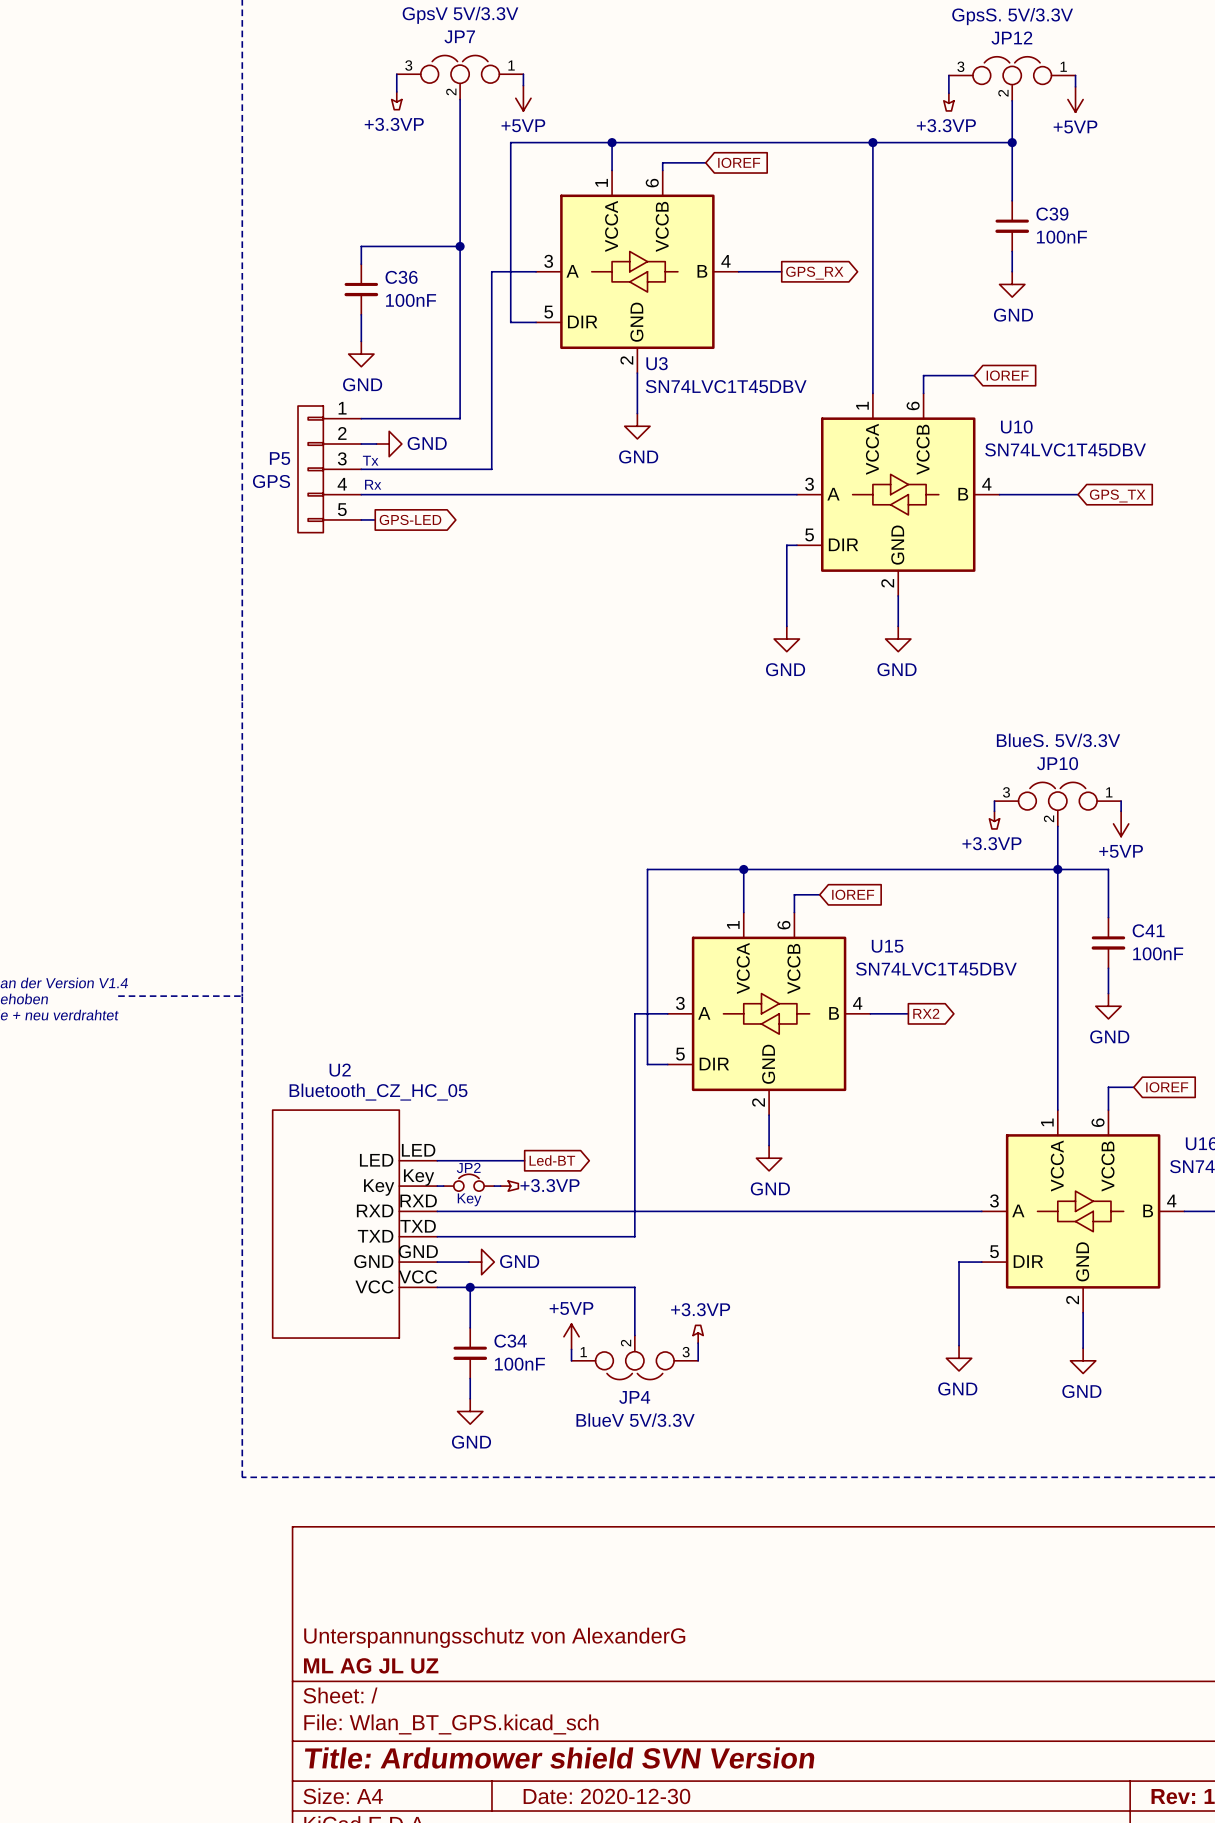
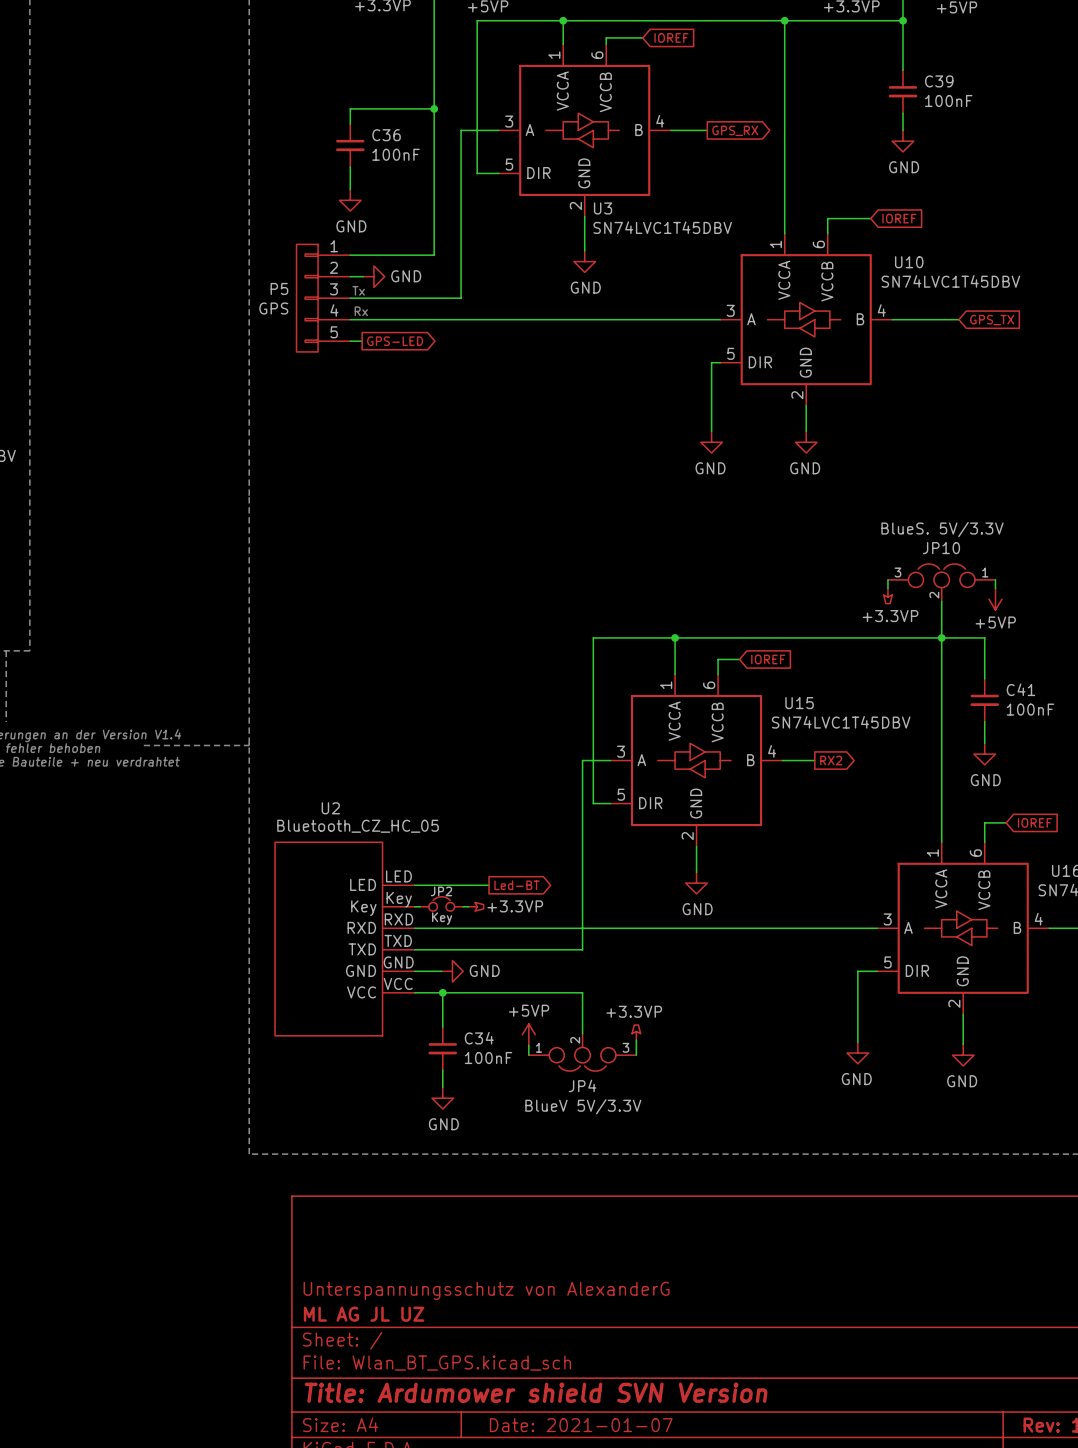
title block: Date: 2020-12-30 (606, 1796) -> Date: 2021-01-07 (581, 1425)

